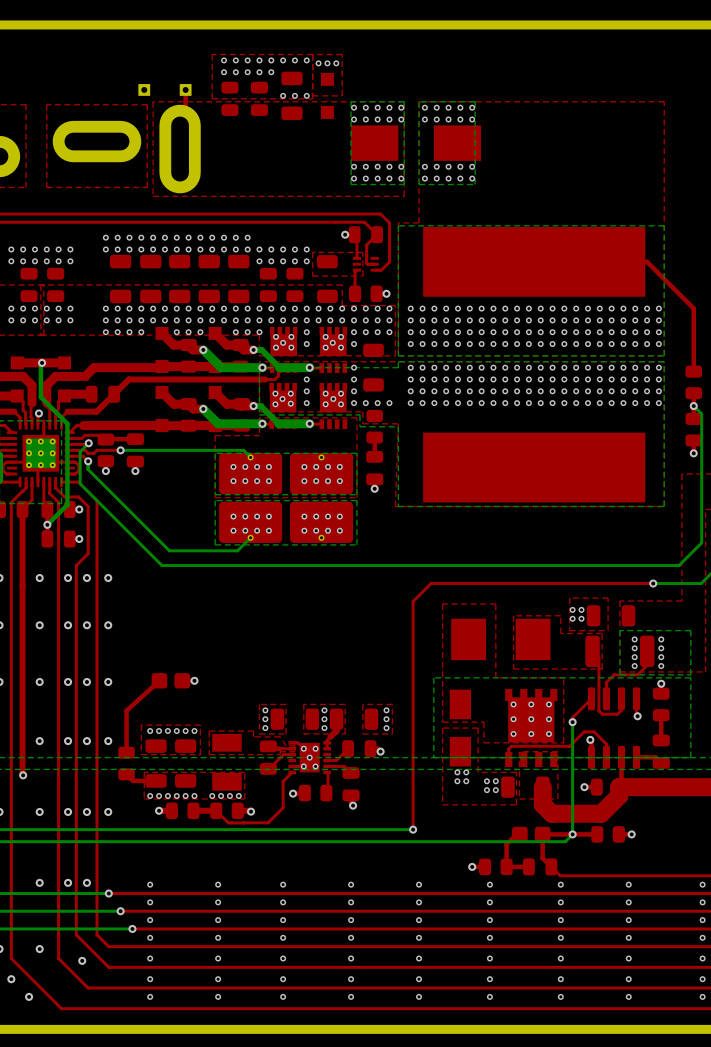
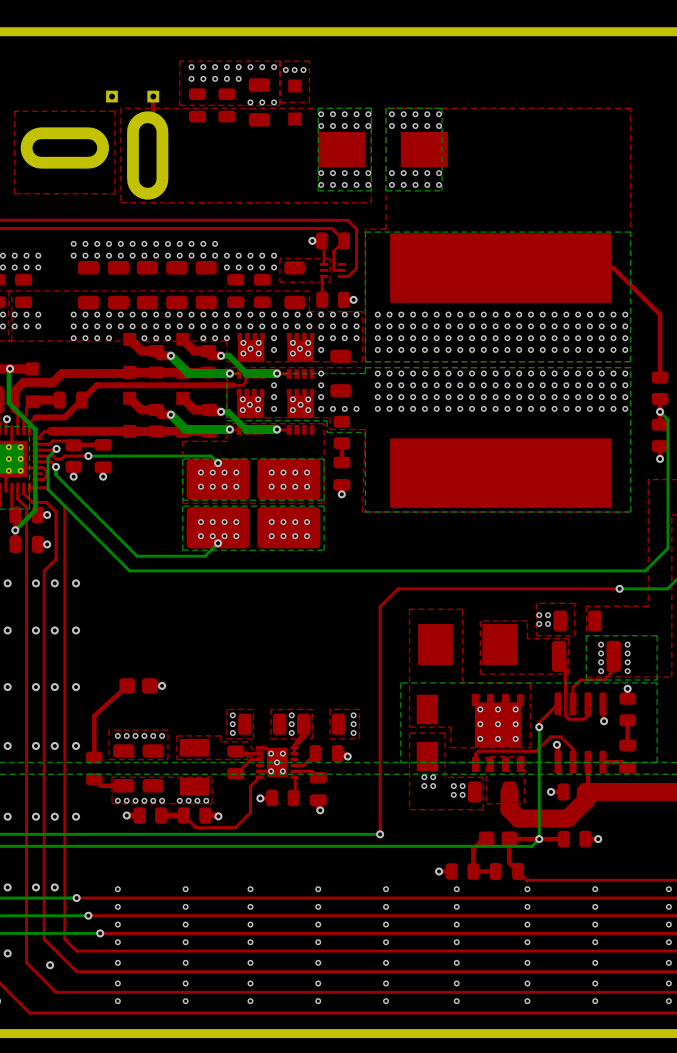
part footprint: [219, 452, 283, 543] -> [186, 458, 250, 549]
part footprint: [290, 452, 354, 543] -> [257, 458, 321, 549]
via: none -> (218, 463)
via: none -> (218, 543)

